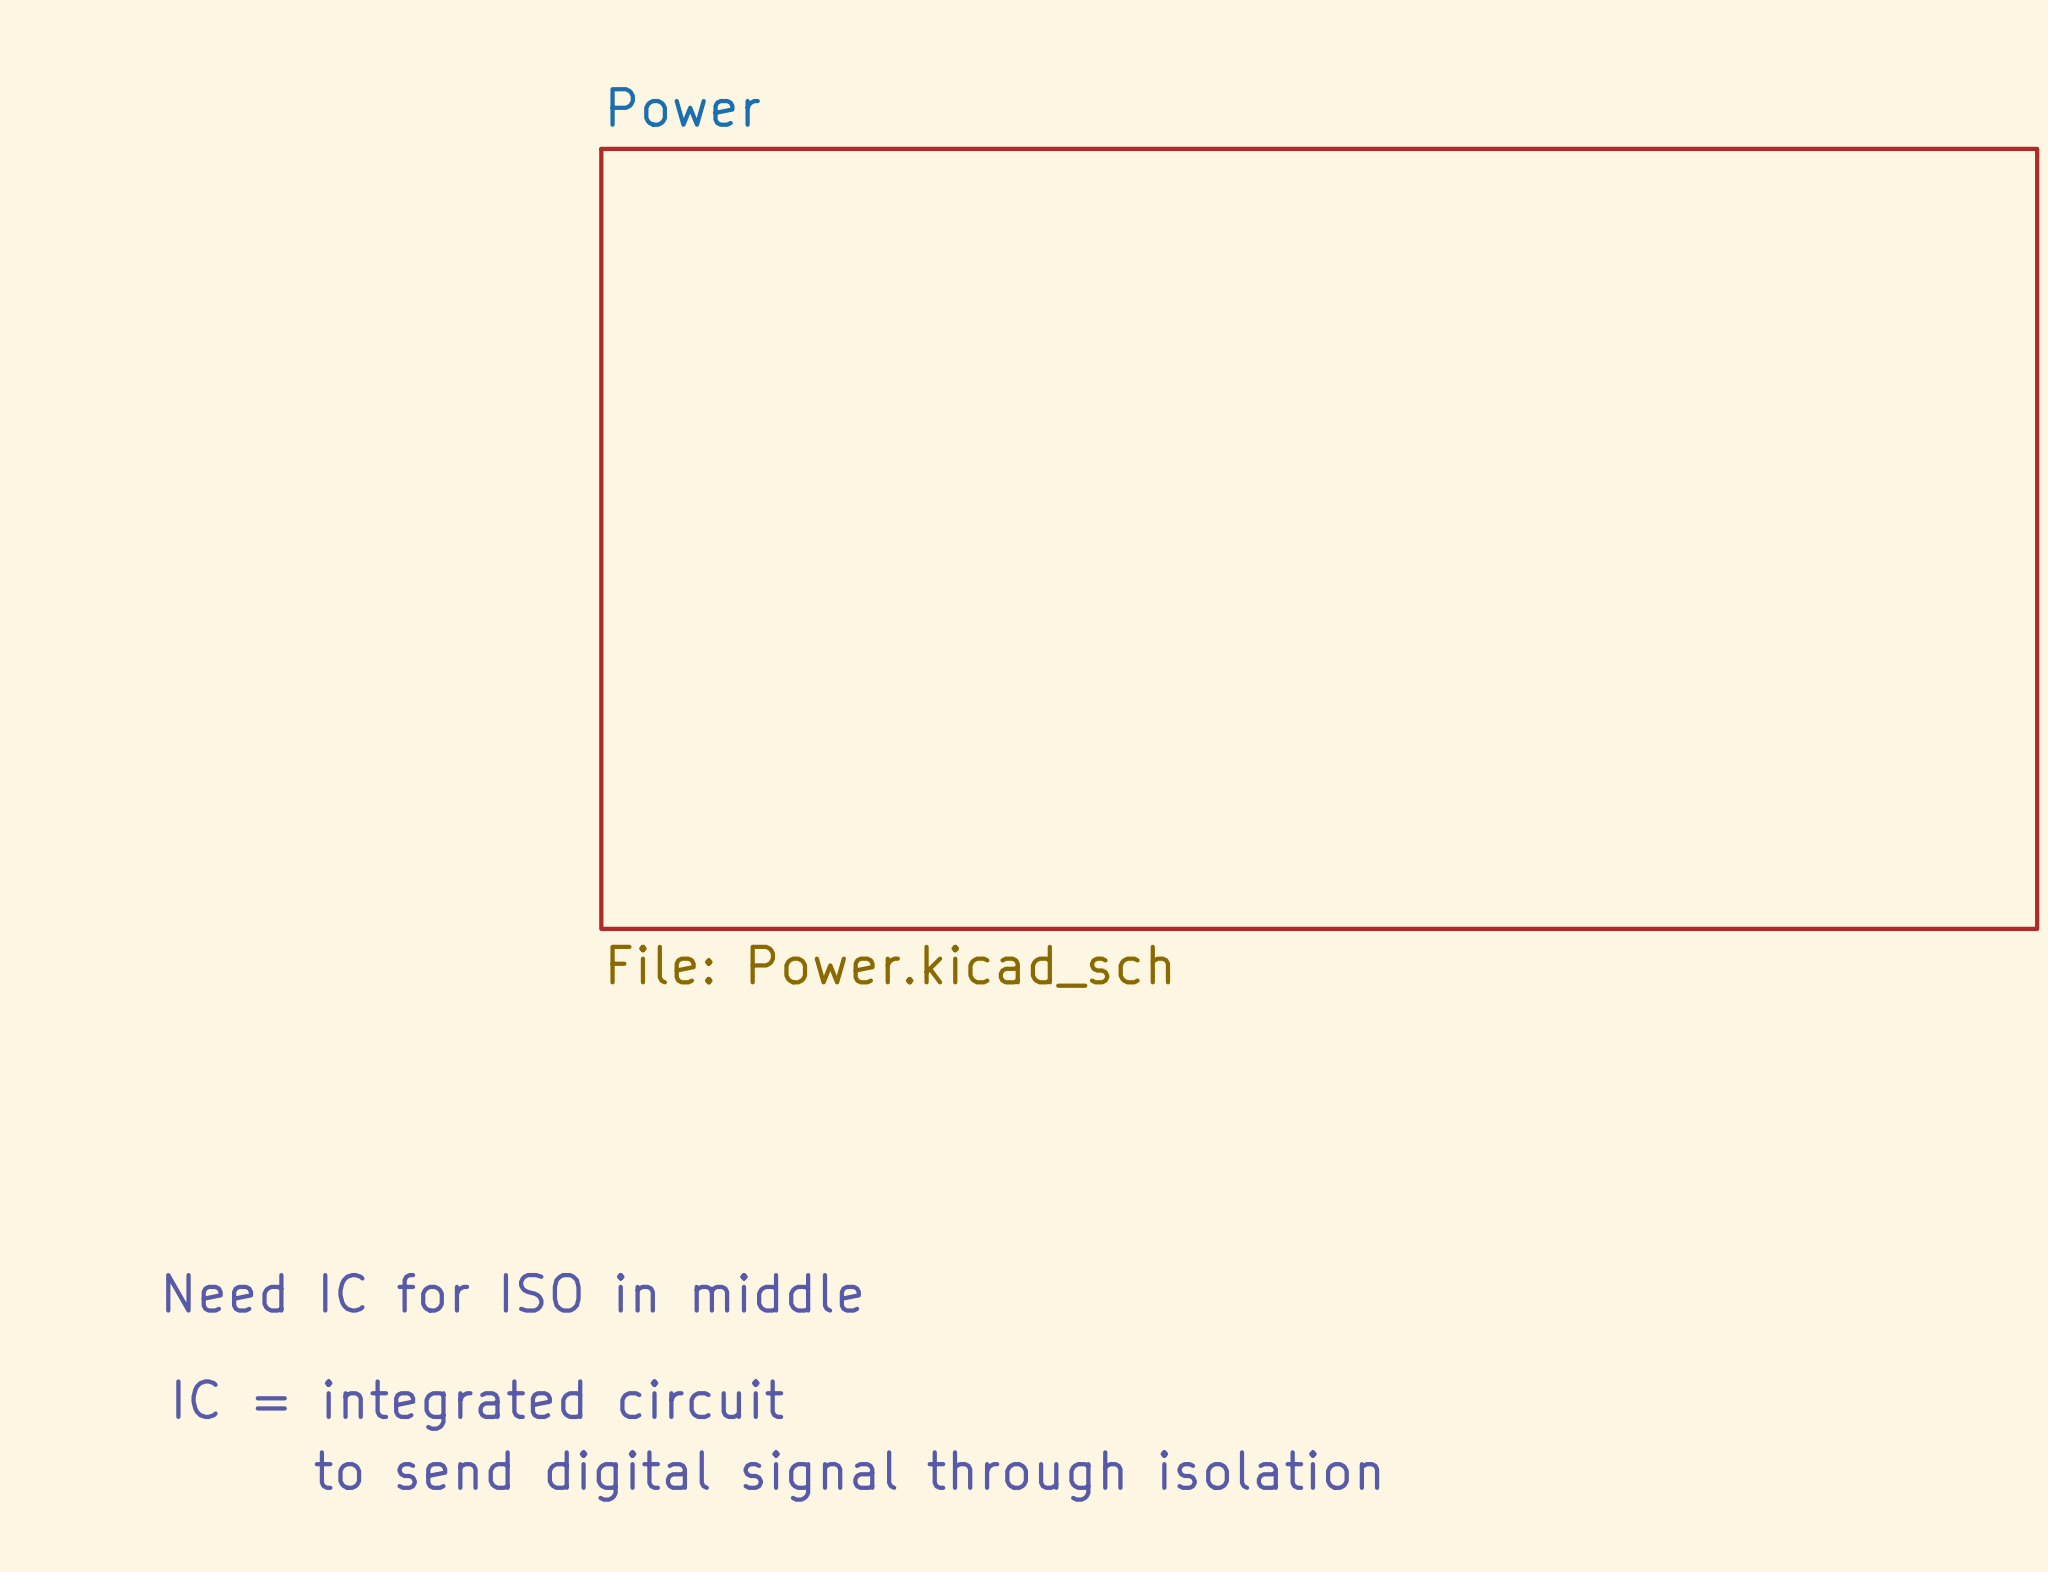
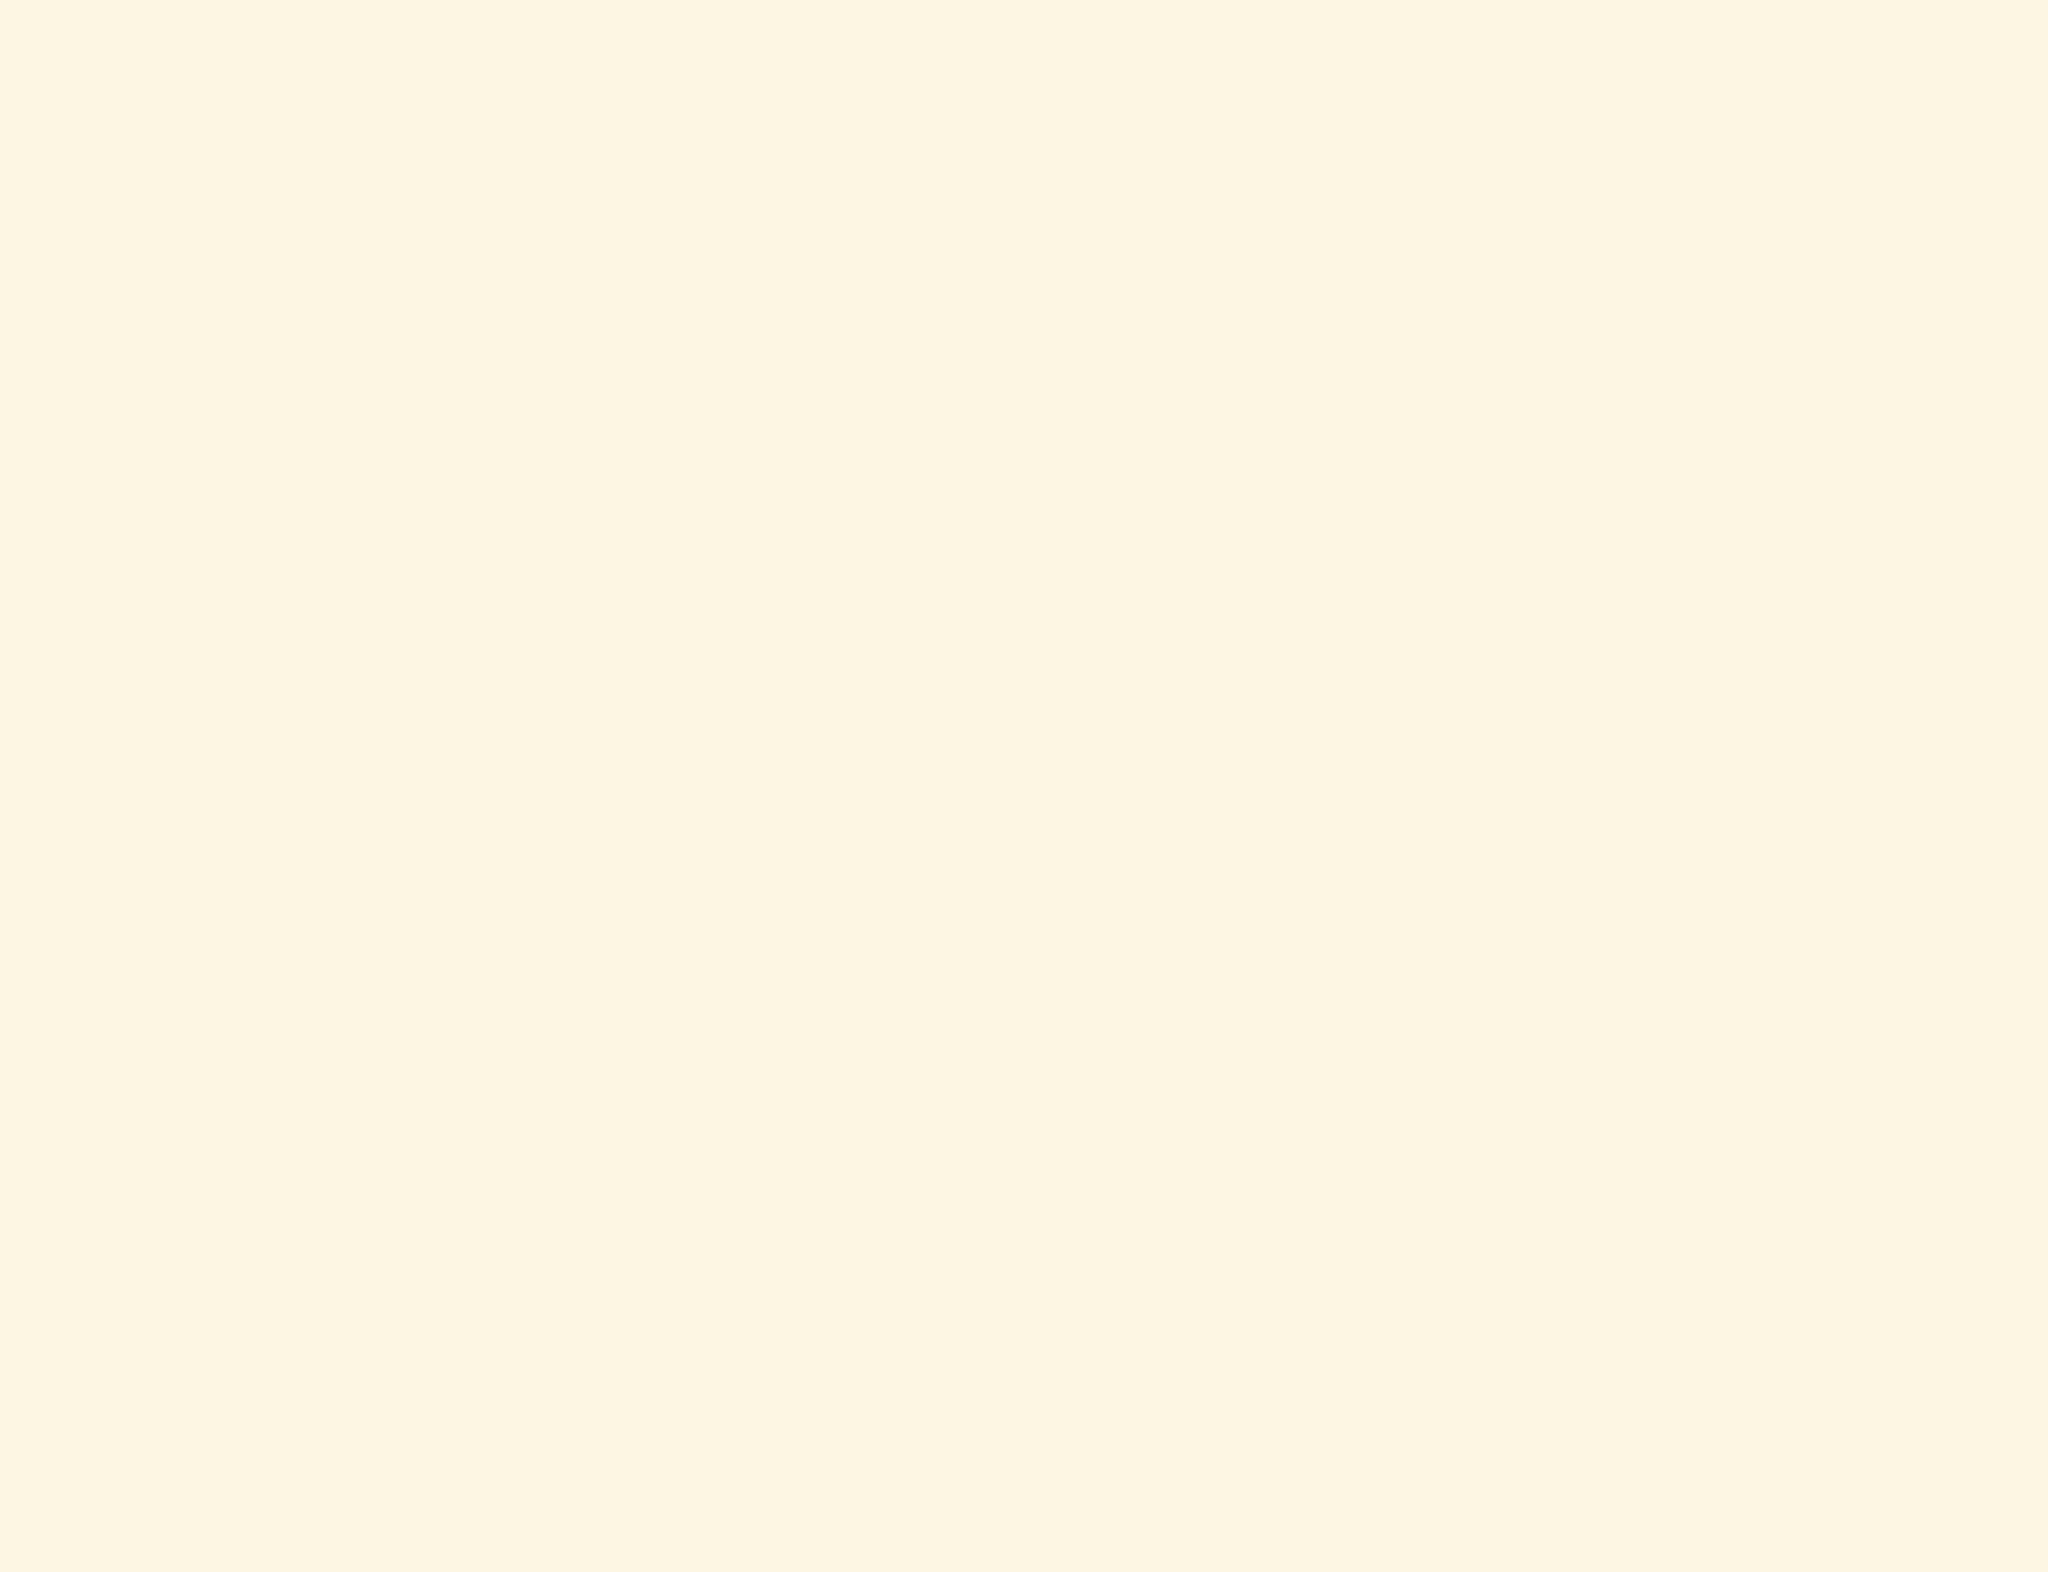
sheet Power: File: Power.kicad_sch (1319, 538) -> none
text: Need IC for ISO in middle (513, 1292) -> none
text: IC = integrated circuit (479, 1405) -> none
text: to send digital signal through isolation (846, 1475) -> none

